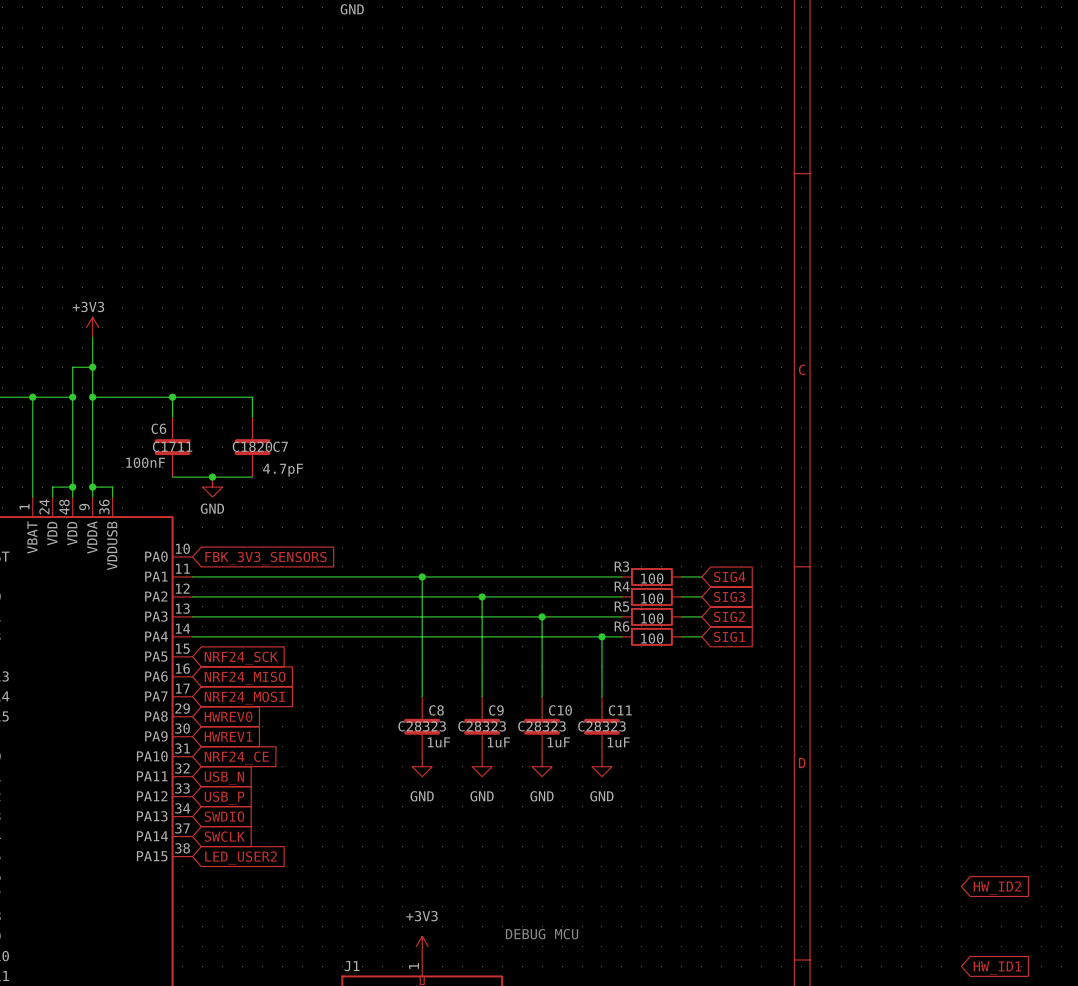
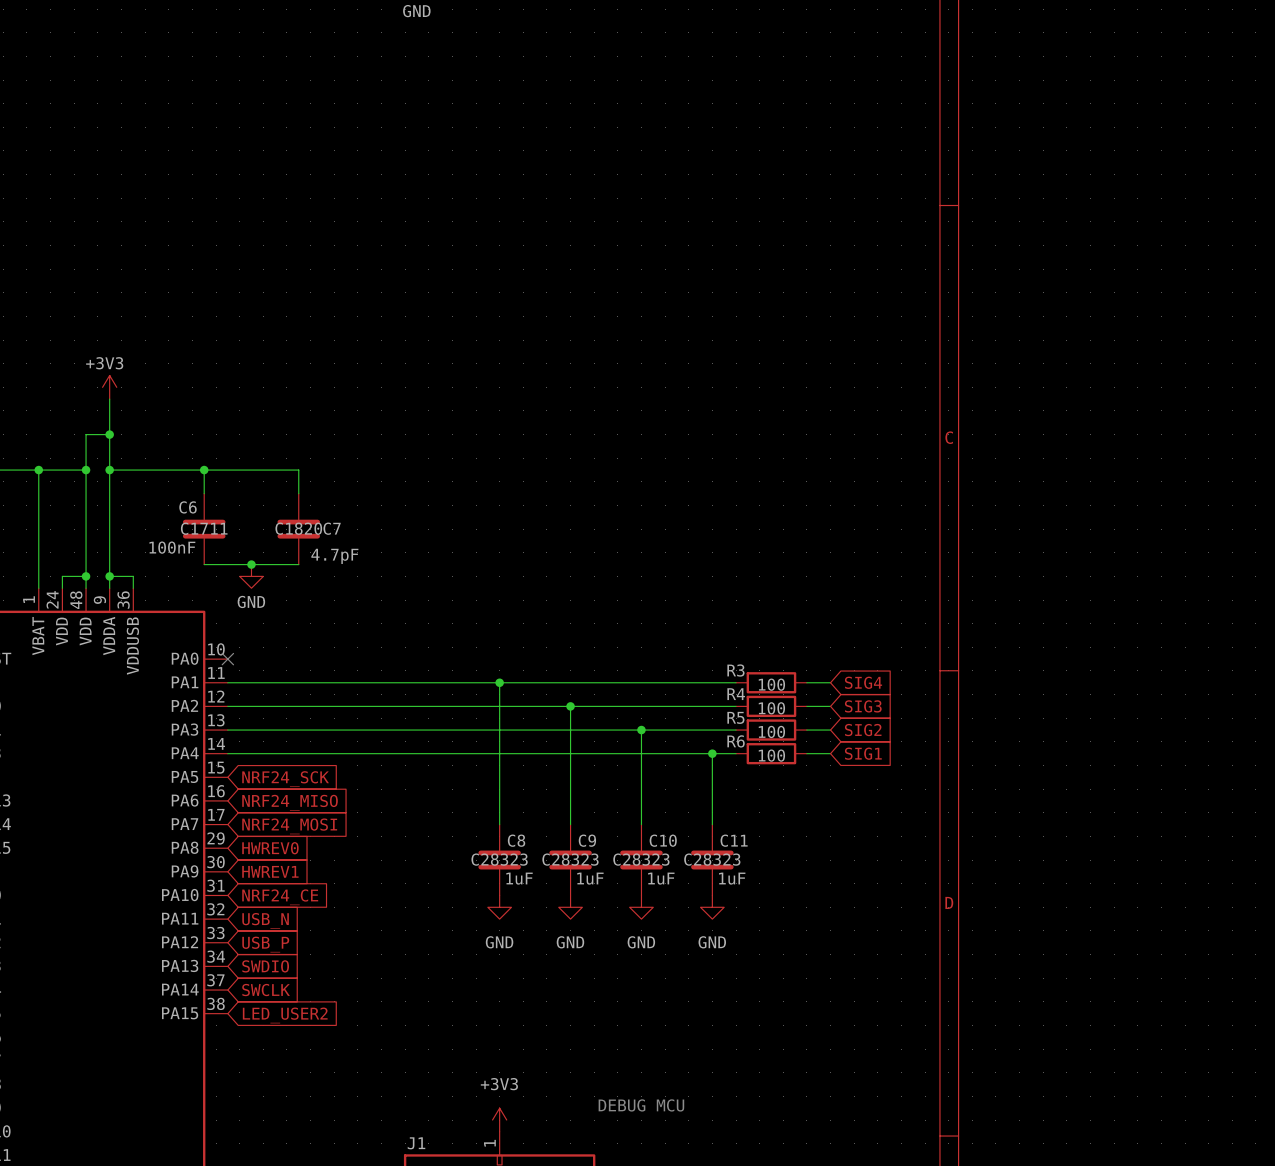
no-connect mark: none -> (227, 659)
global label: FBK_3V3_SENSORS (265, 558) -> none
global label: HW_ID2 (997, 888) -> none
global label: HW_ID1 (997, 968) -> none

